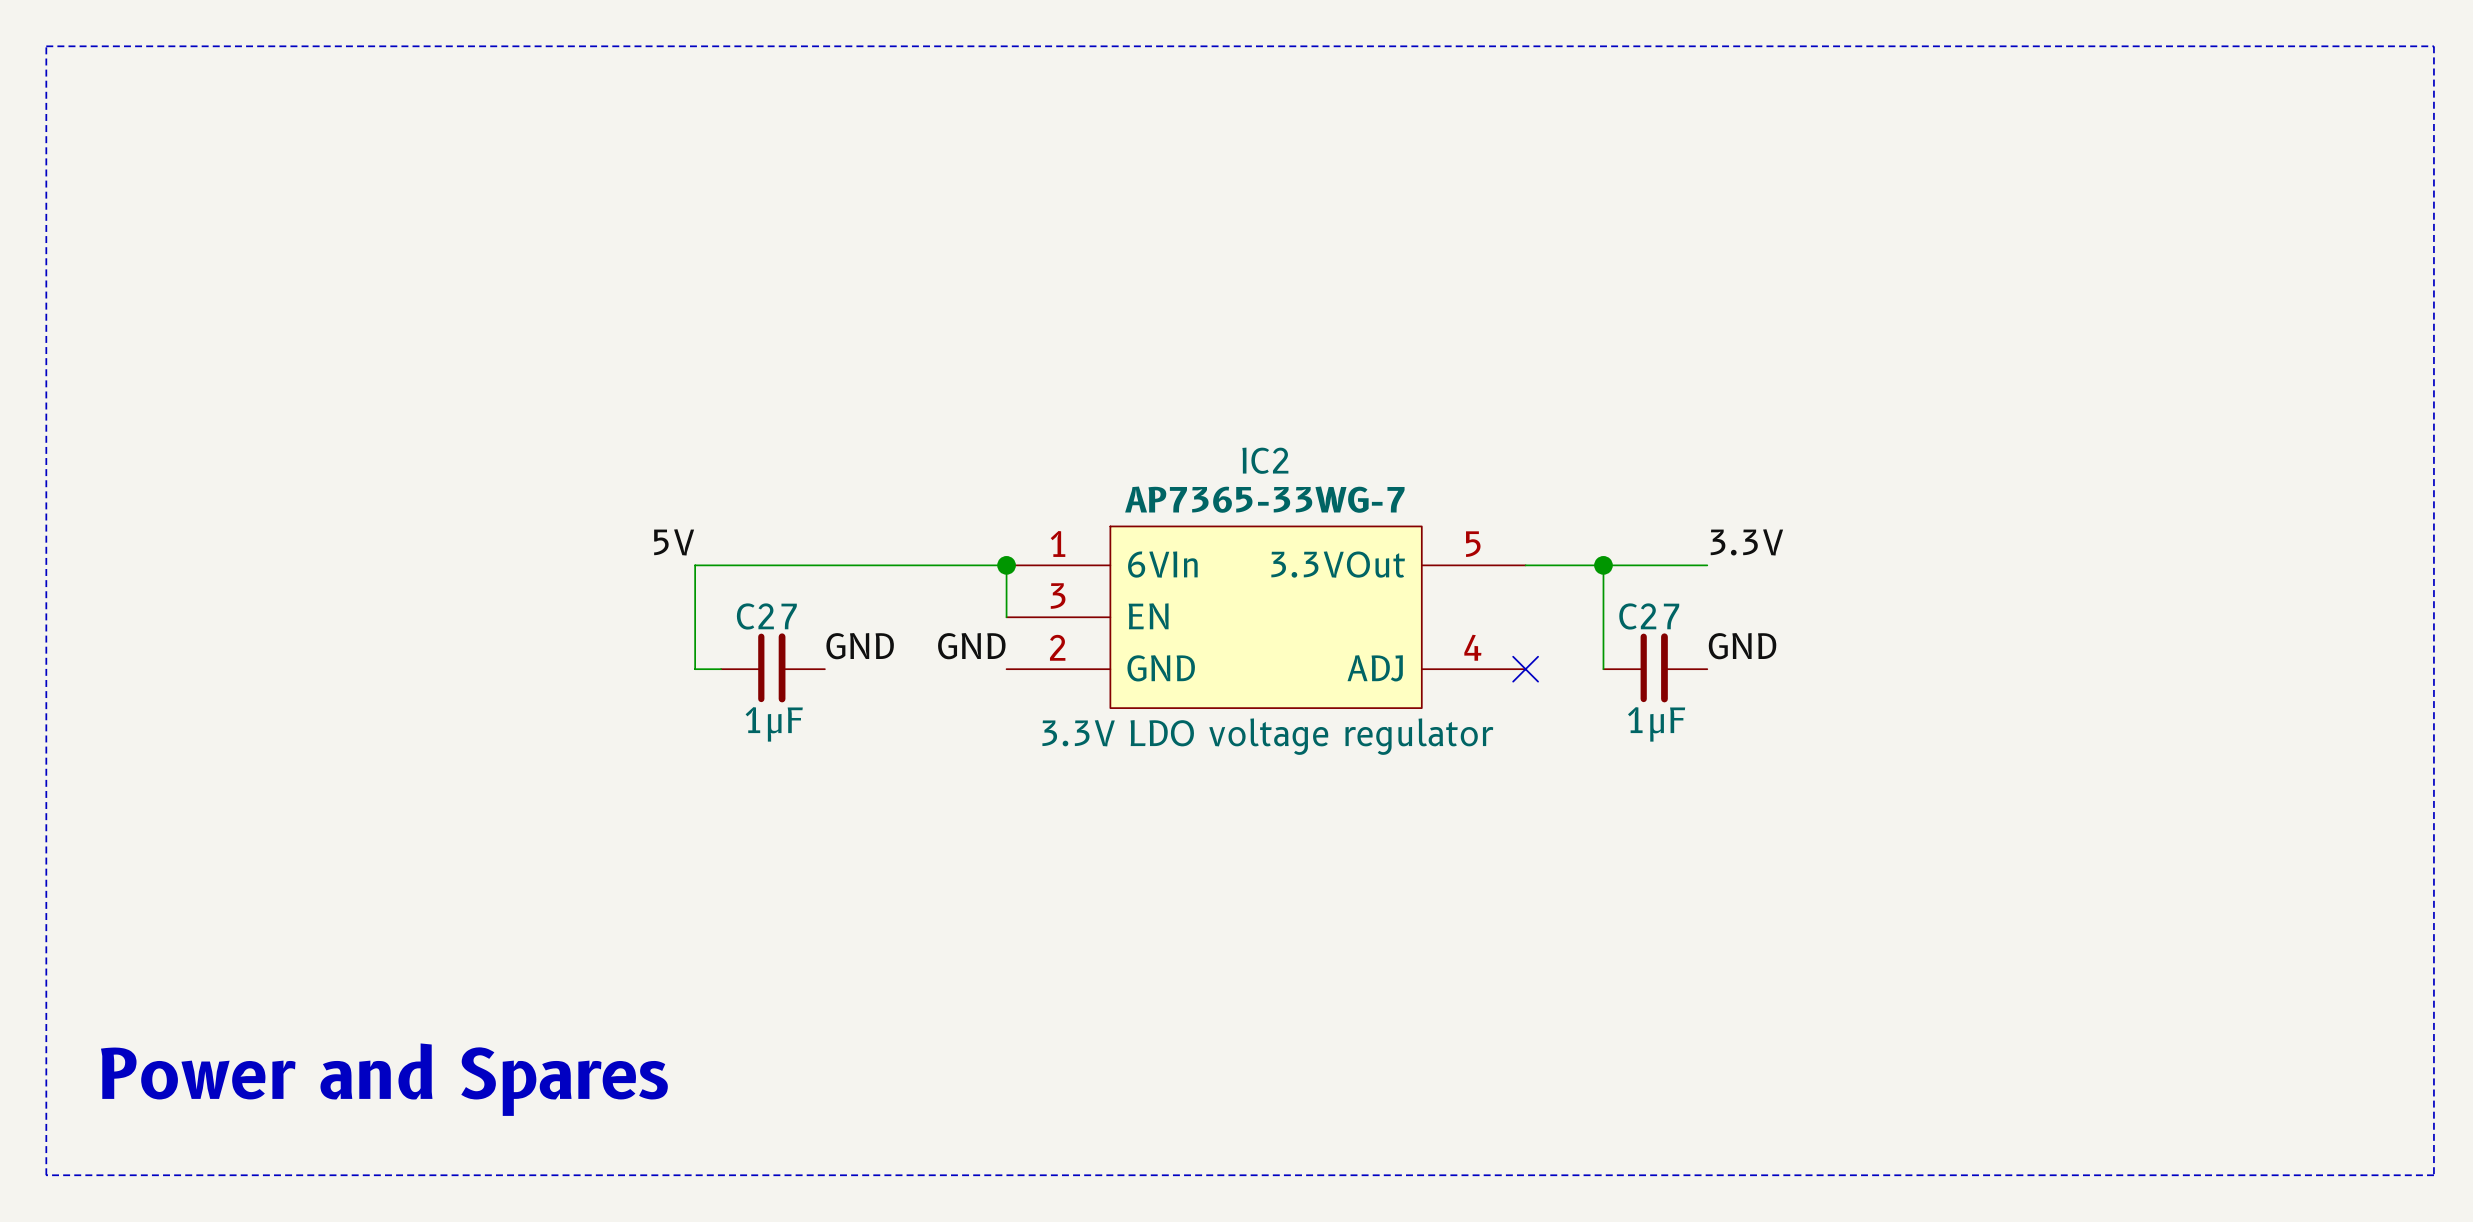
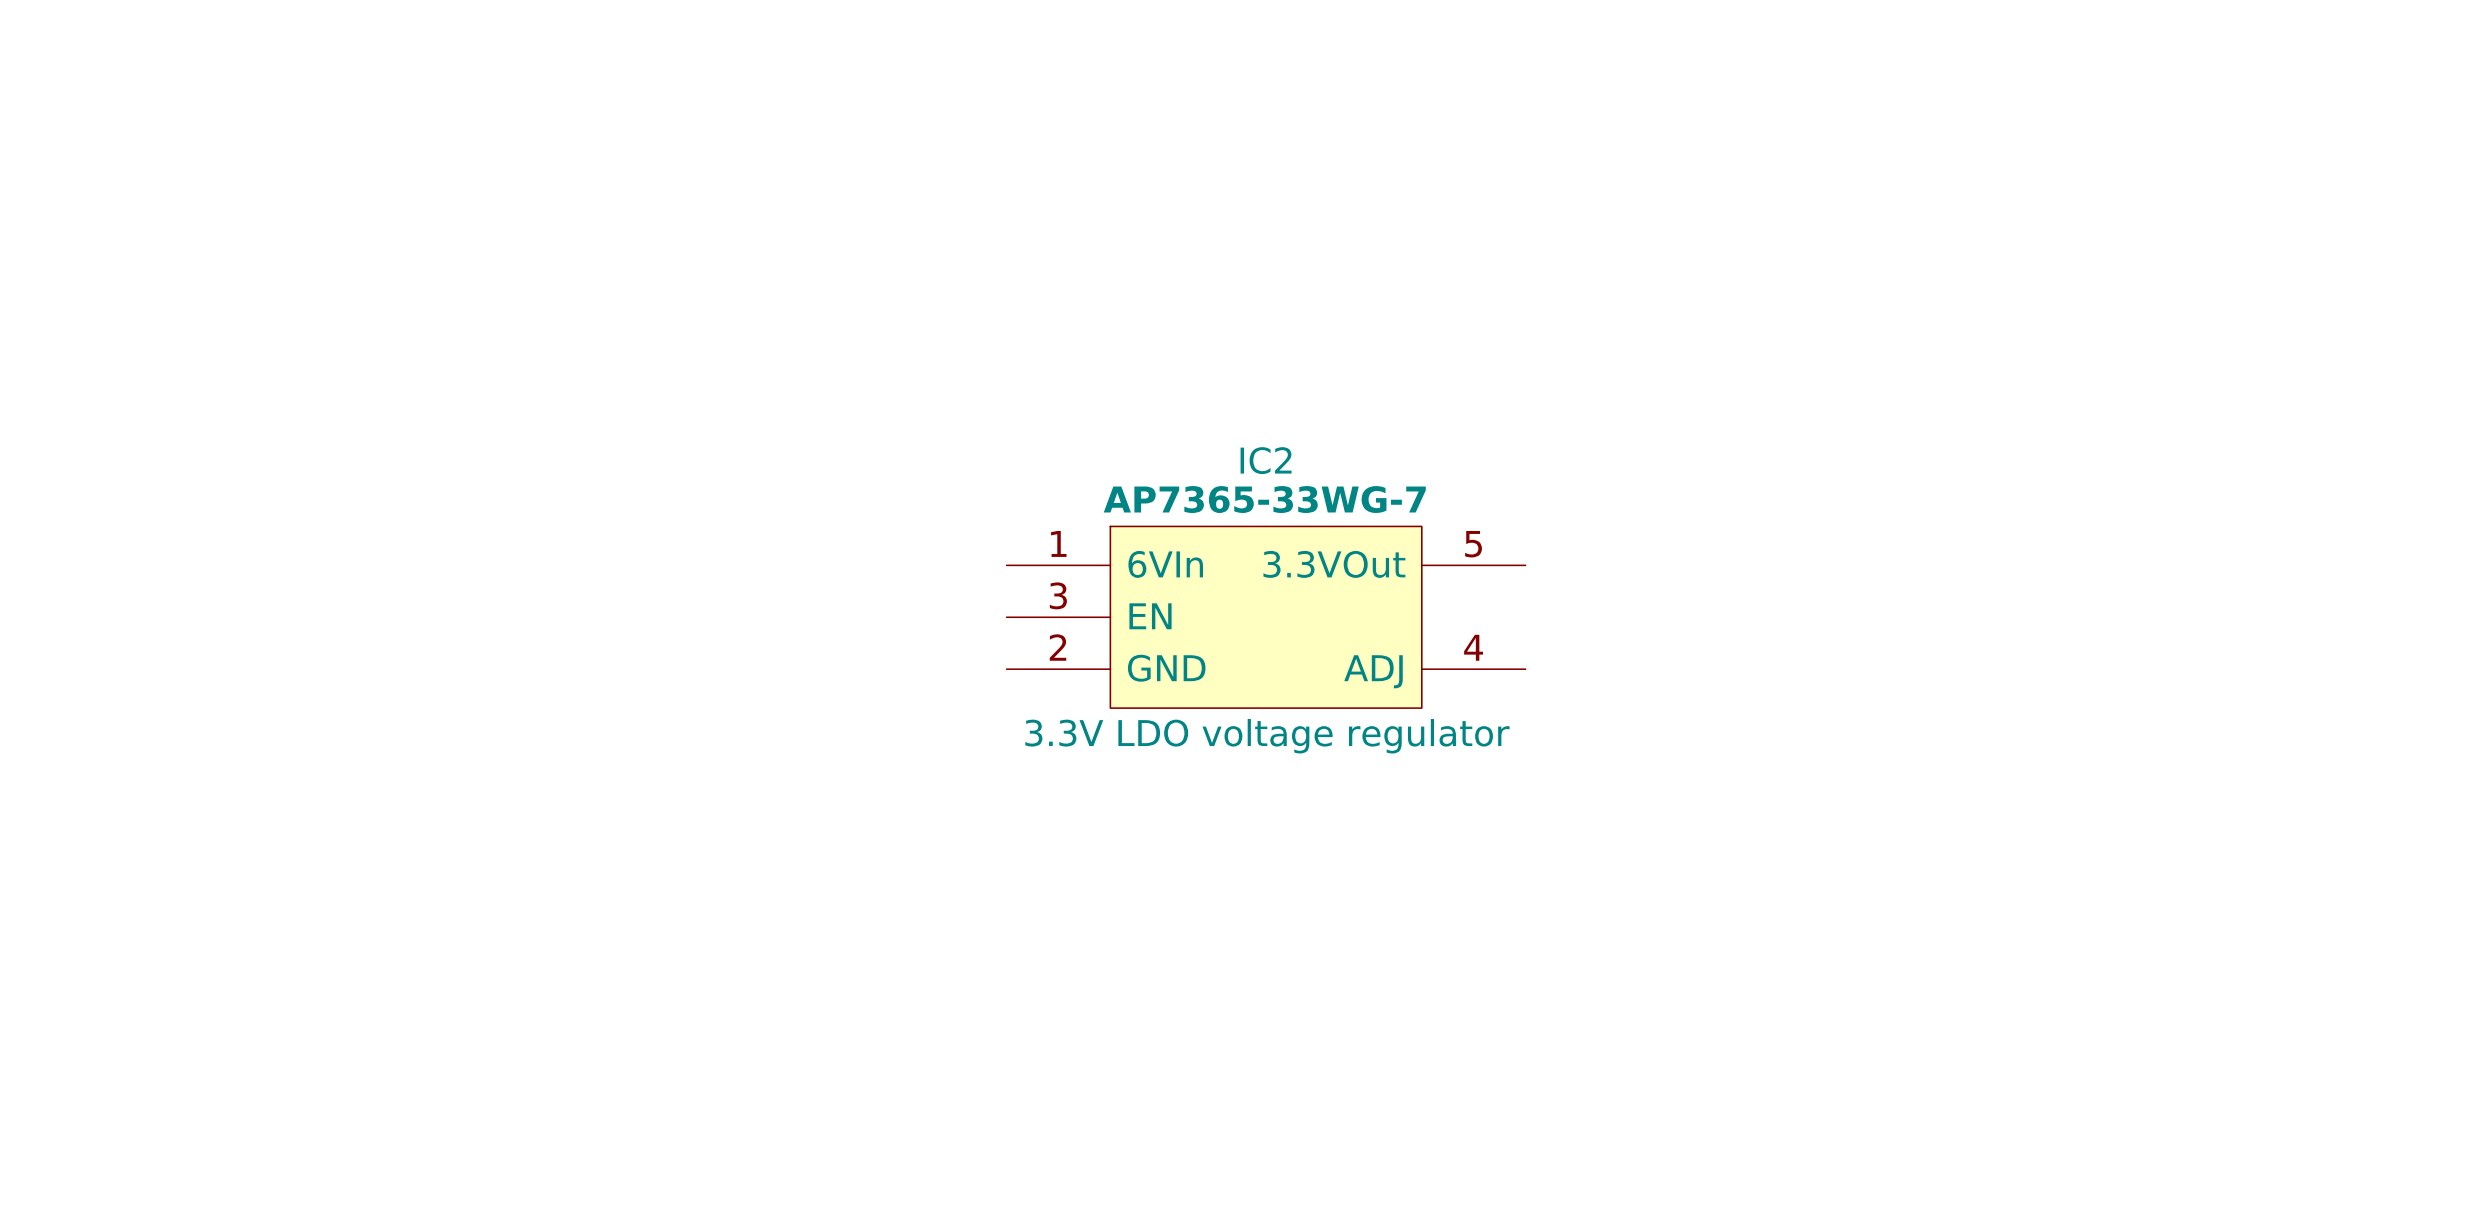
line: (46, 46) (2433, 46) (2433, 1175) (46, 1175) (46, 46) -> none
label: 5V (674, 542) -> none
label: 3.3V (1746, 542) -> none
junction: (1006, 565) -> none
wire: (1525, 565) (1707, 565) -> none
wire: (1603, 565) (1603, 669) -> none
junction: (1603, 565) -> none
wire: (1006, 617) (1006, 565) (695, 565) (695, 669) (721, 669) -> none
label: GND (860, 646) -> none
label: GND (971, 646) -> none
label: GND (1742, 646) -> none
C27: 1μF (772, 667) -> none
C27: 1μF (1655, 667) -> none
no-connect mark: (1525, 669) -> none
text: Power and Spares (384, 1079) -> none

